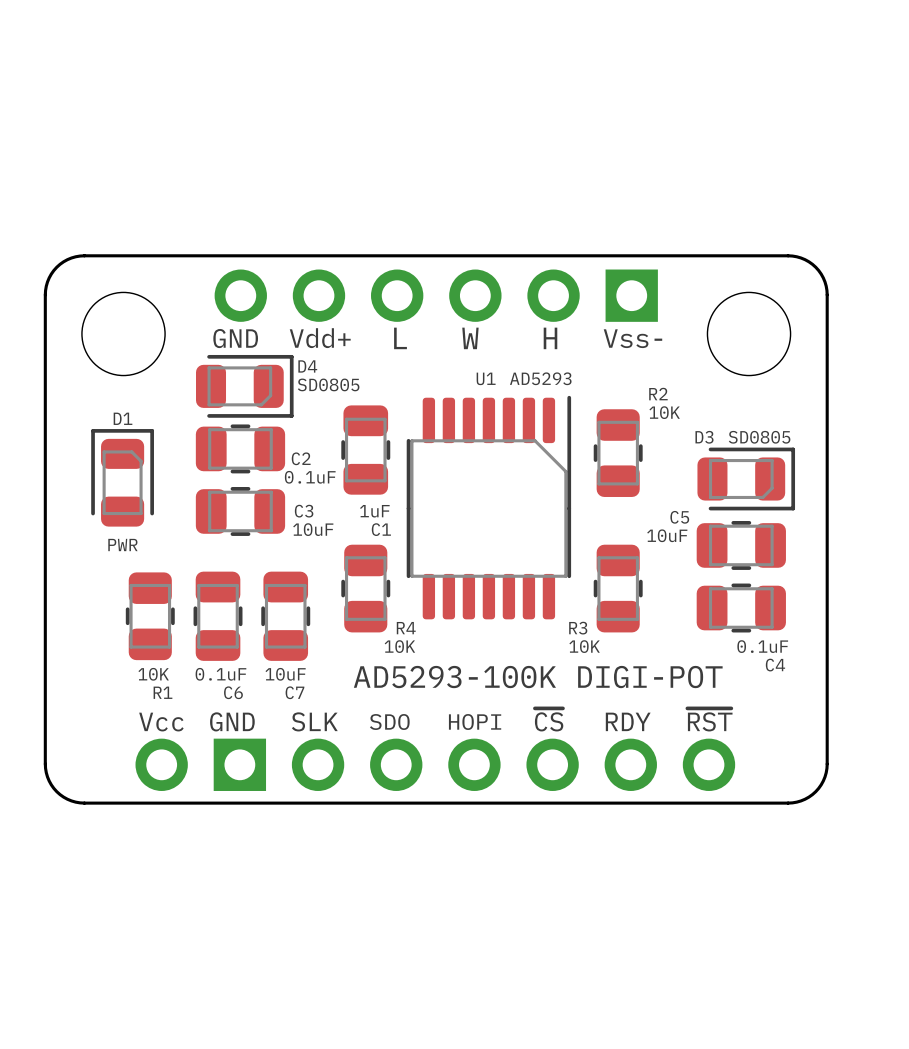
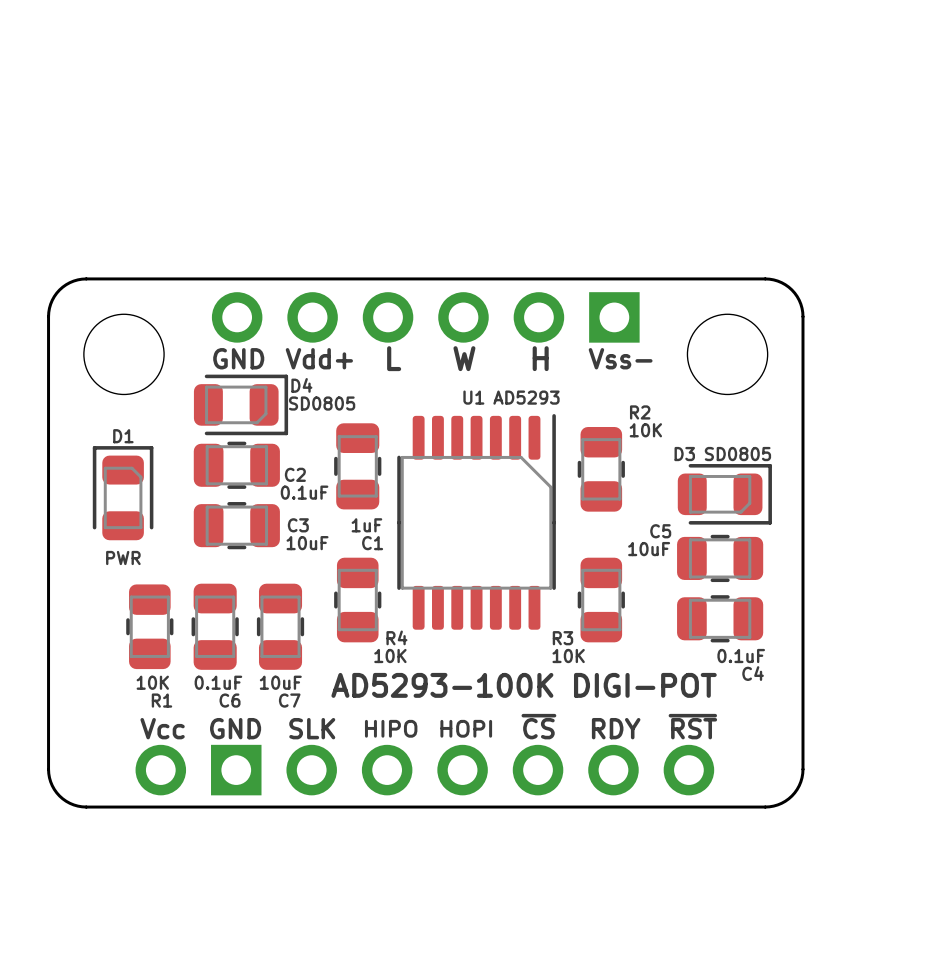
text: SDO (389, 722) -> HIPO (391, 728)

